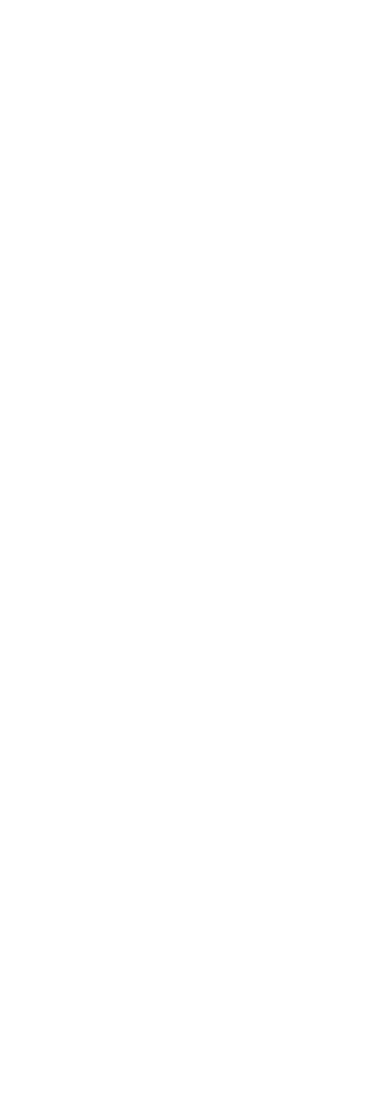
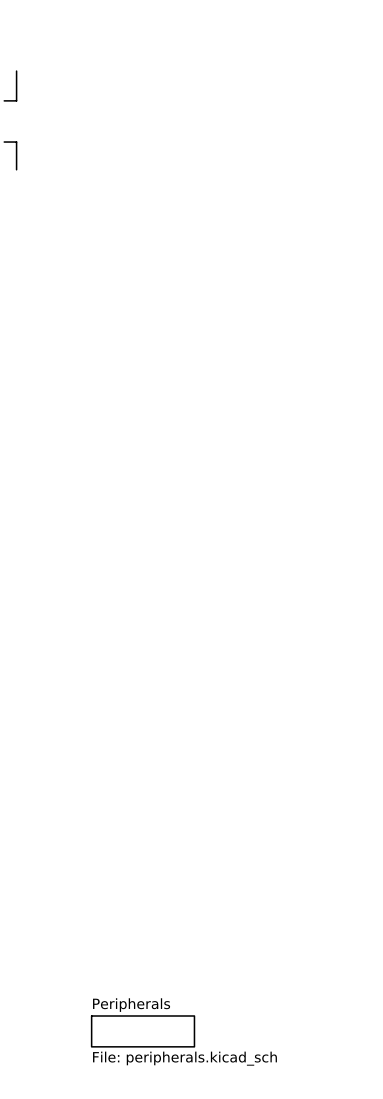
wire: none -> (16, 71) (16, 100) (4, 100)
wire: none -> (4, 142) (16, 142) (16, 169)
sheet Peripherals: none -> File: peripherals.kicad_sch (143, 1031)

